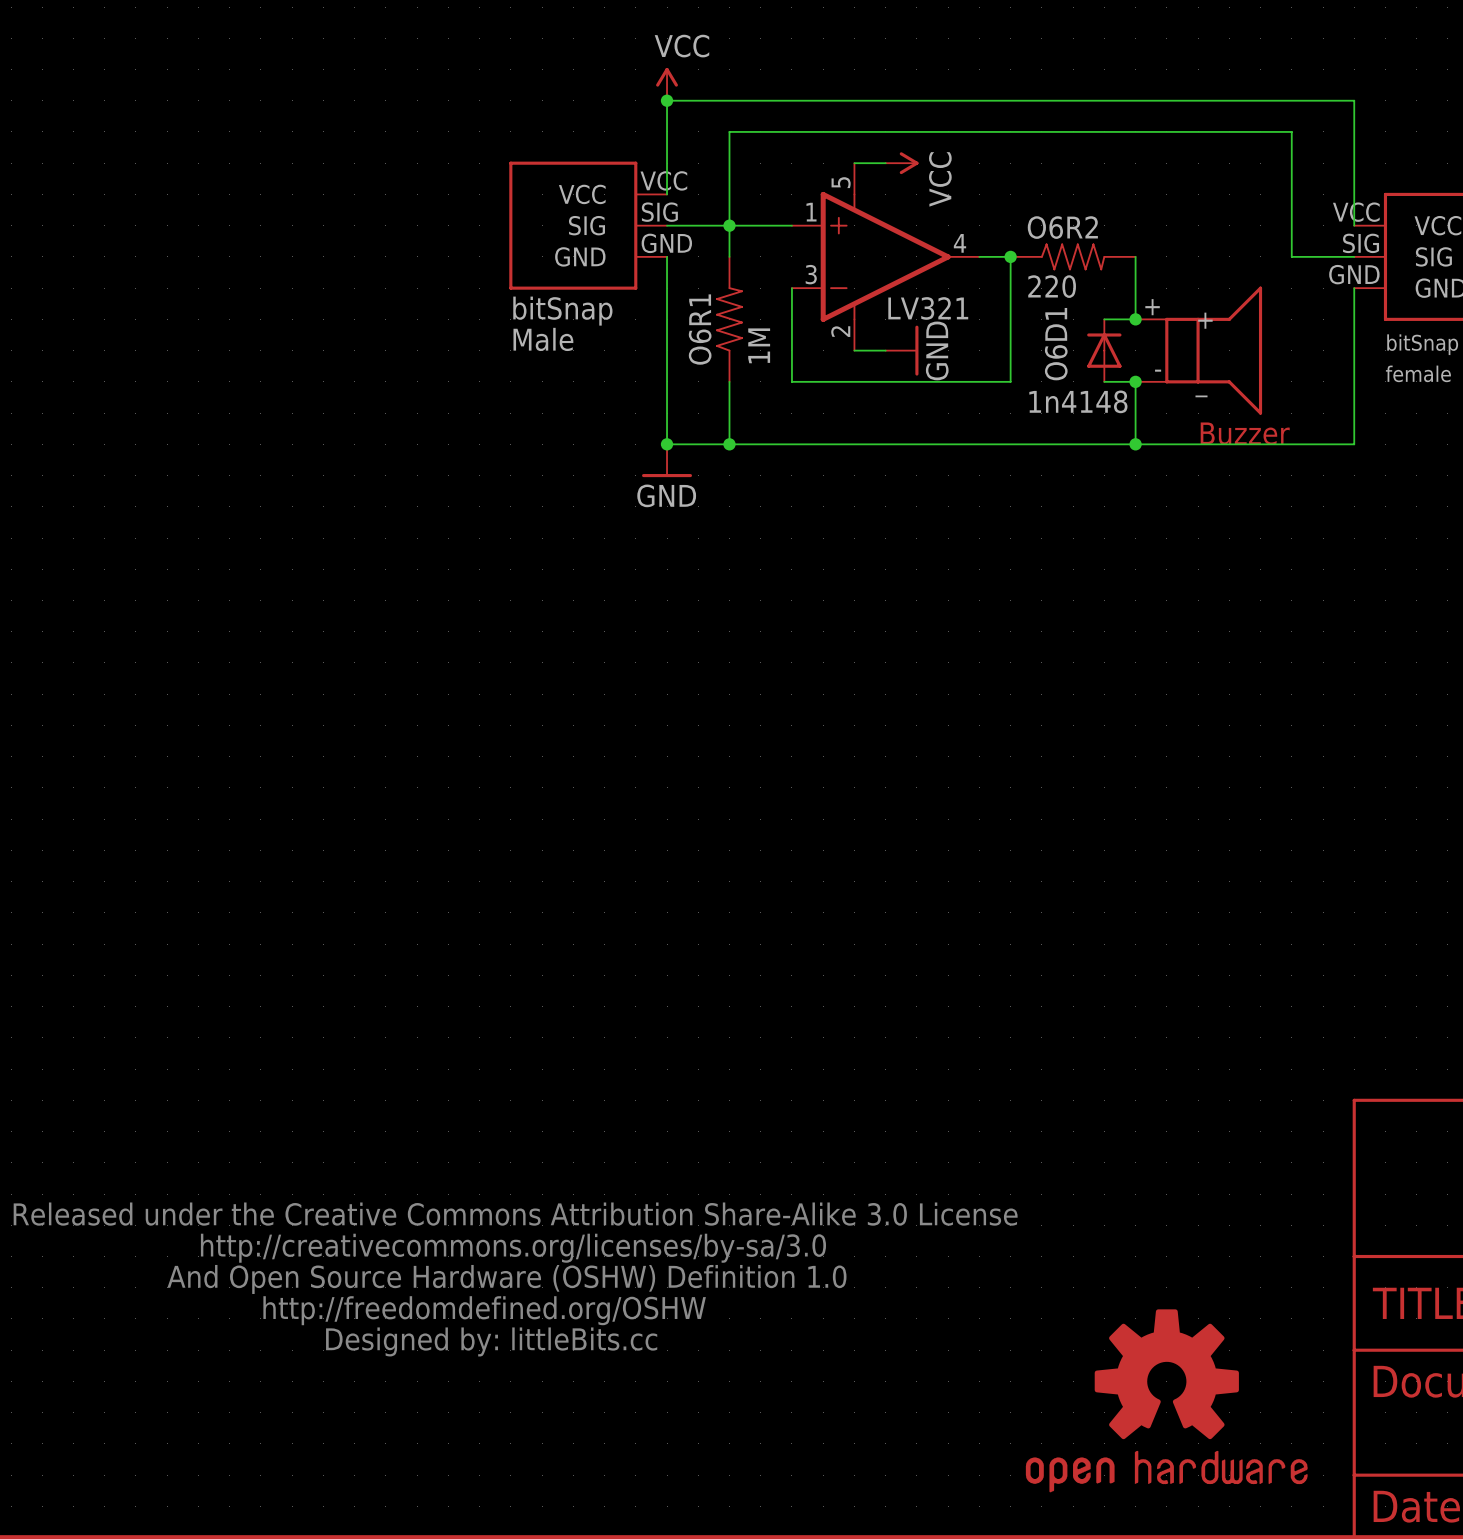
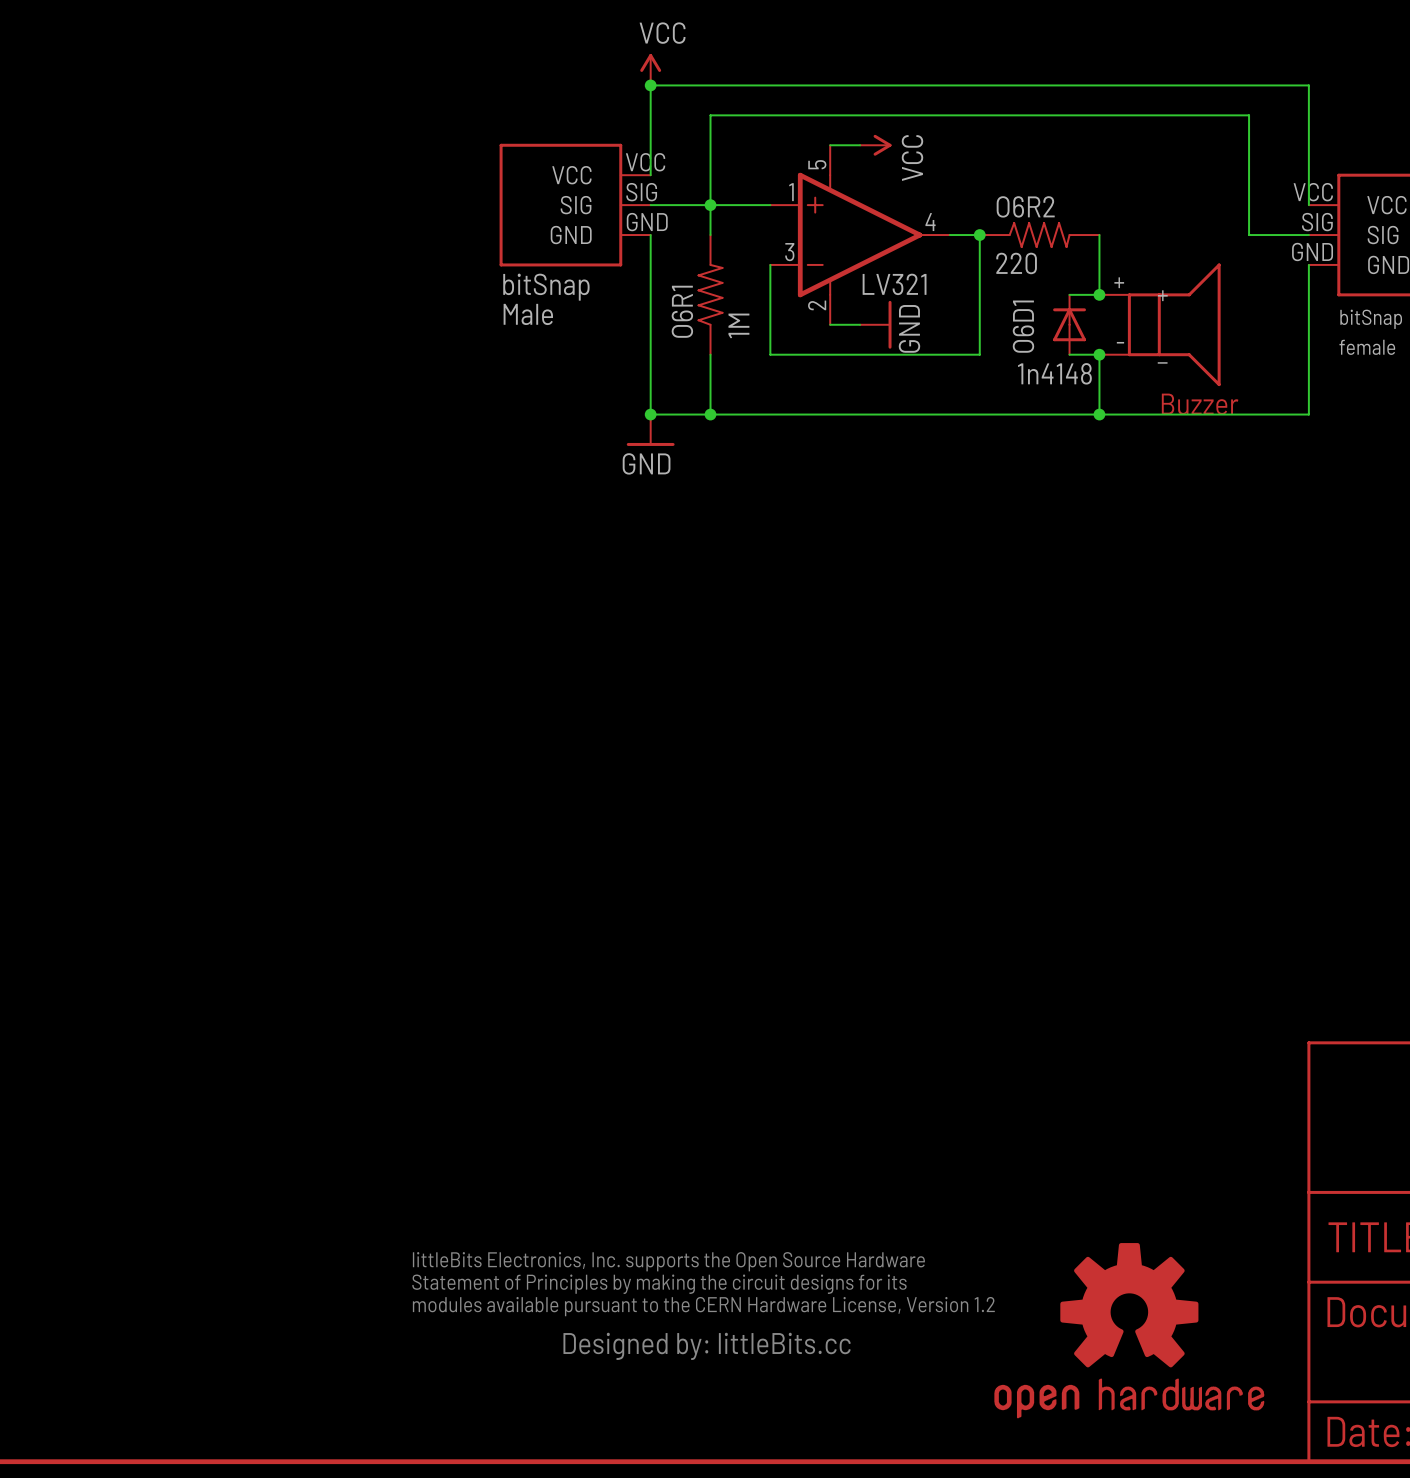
part: (515, 1279) -> none
part: none -> (703, 1306)

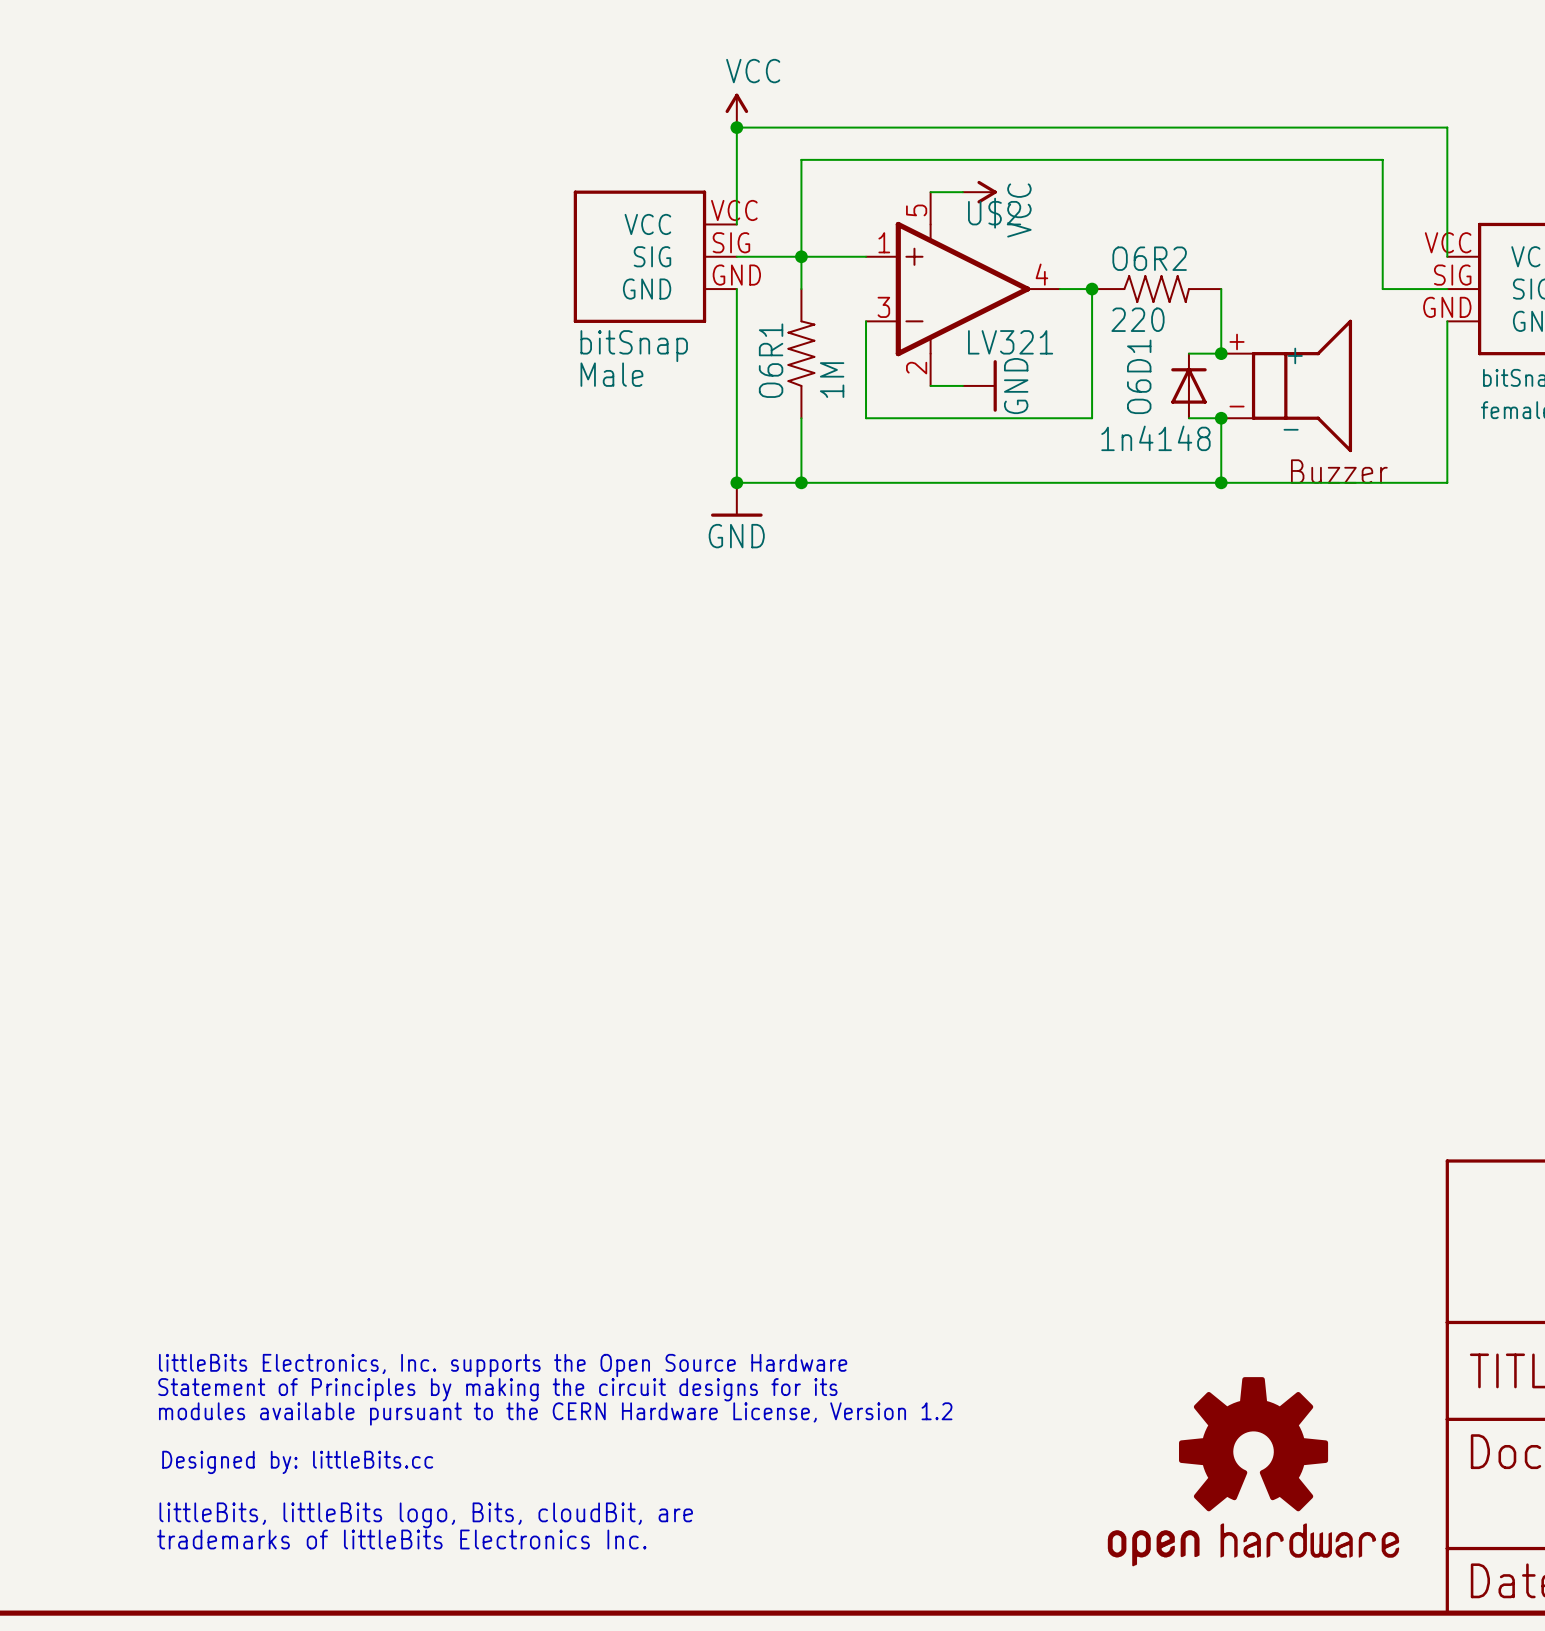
U$2 name: none -> U$2 (994, 213)
part: (703, 1306) -> none
part: none -> (554, 1451)

